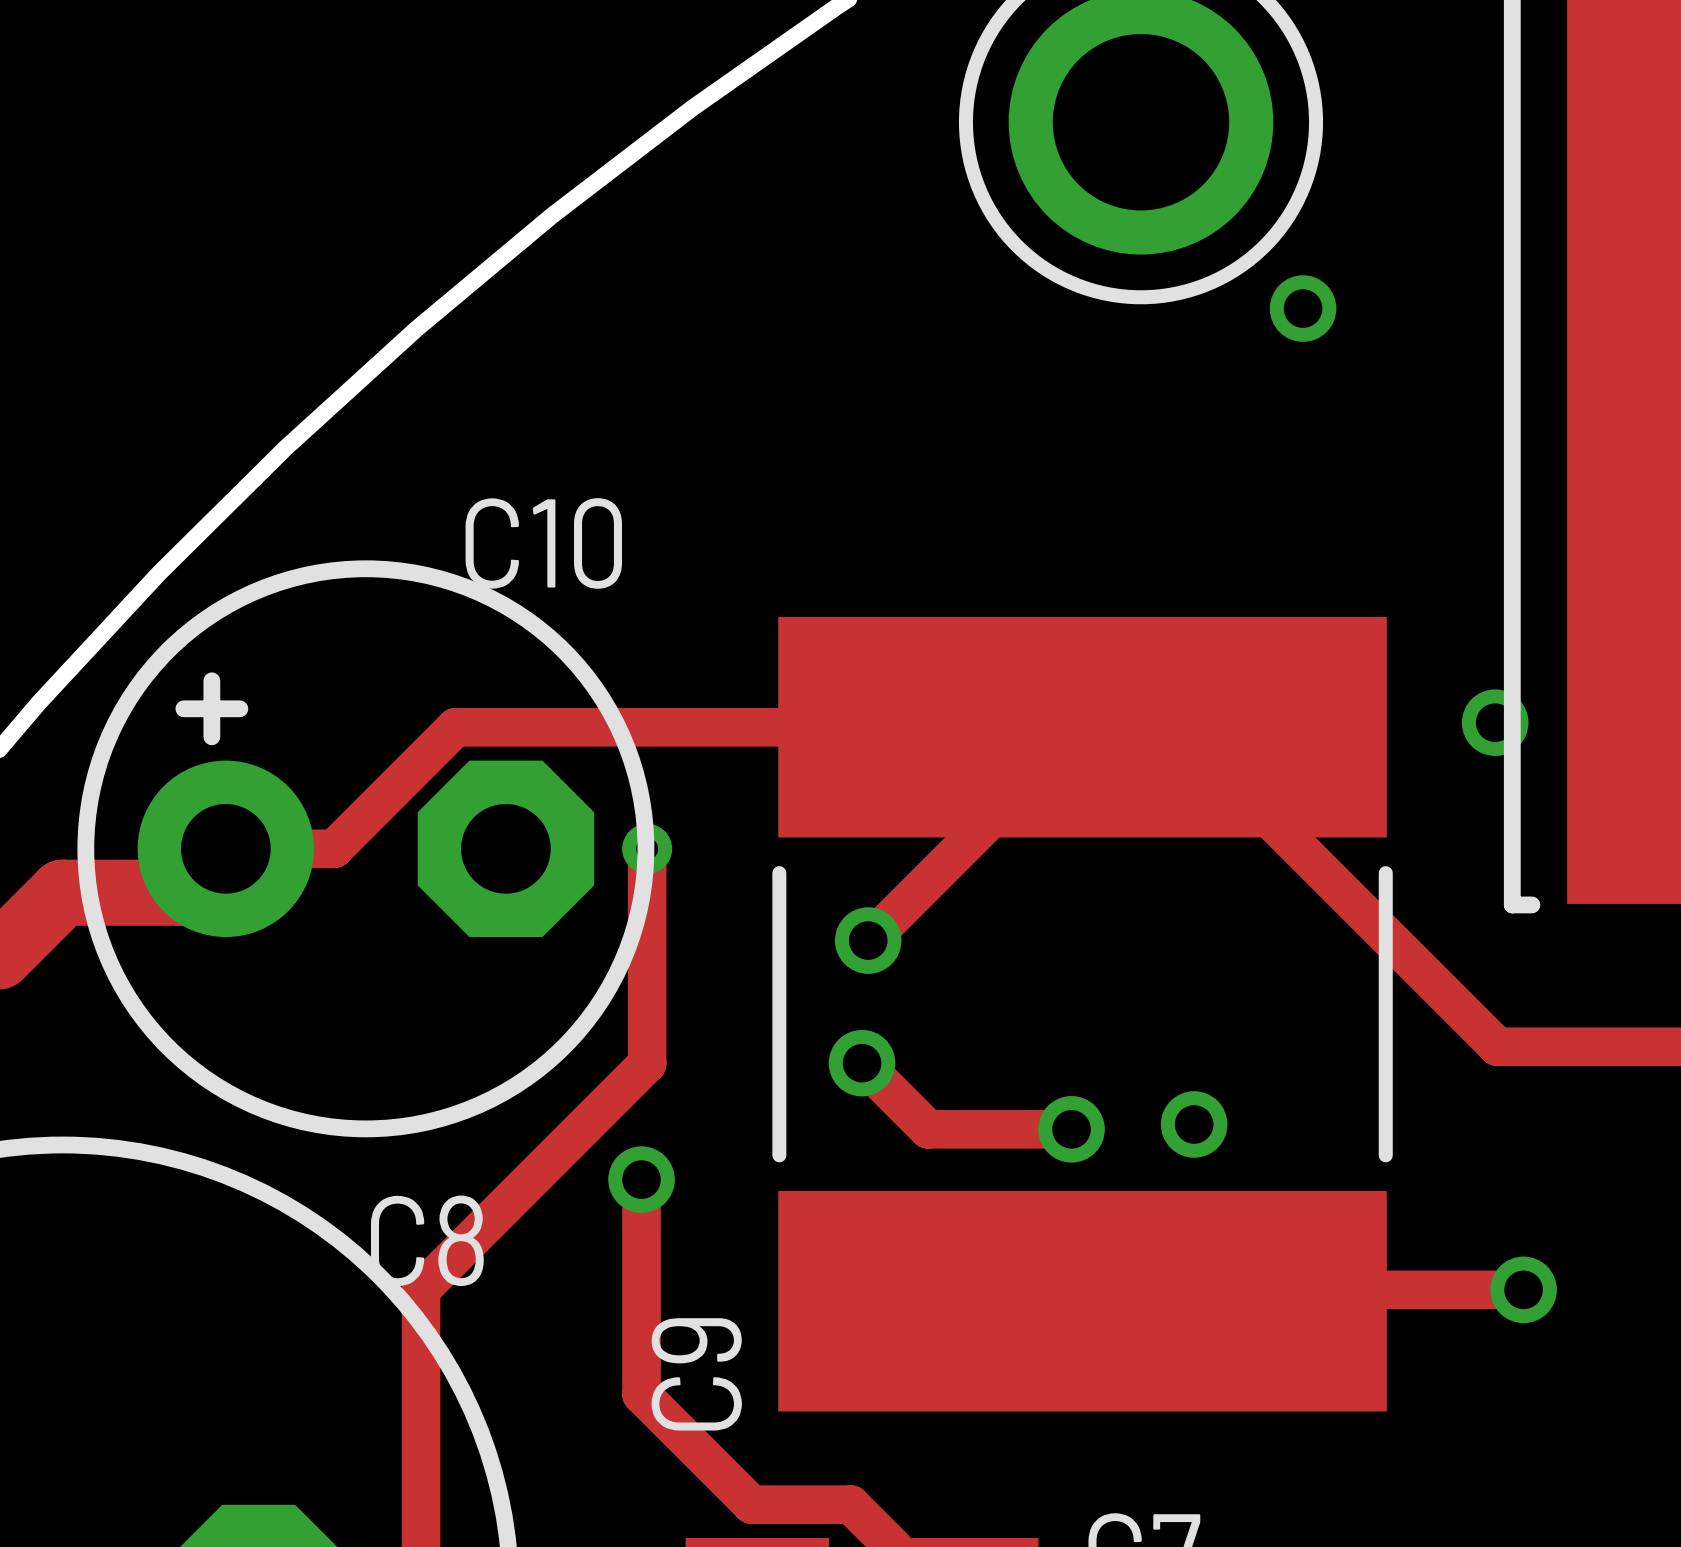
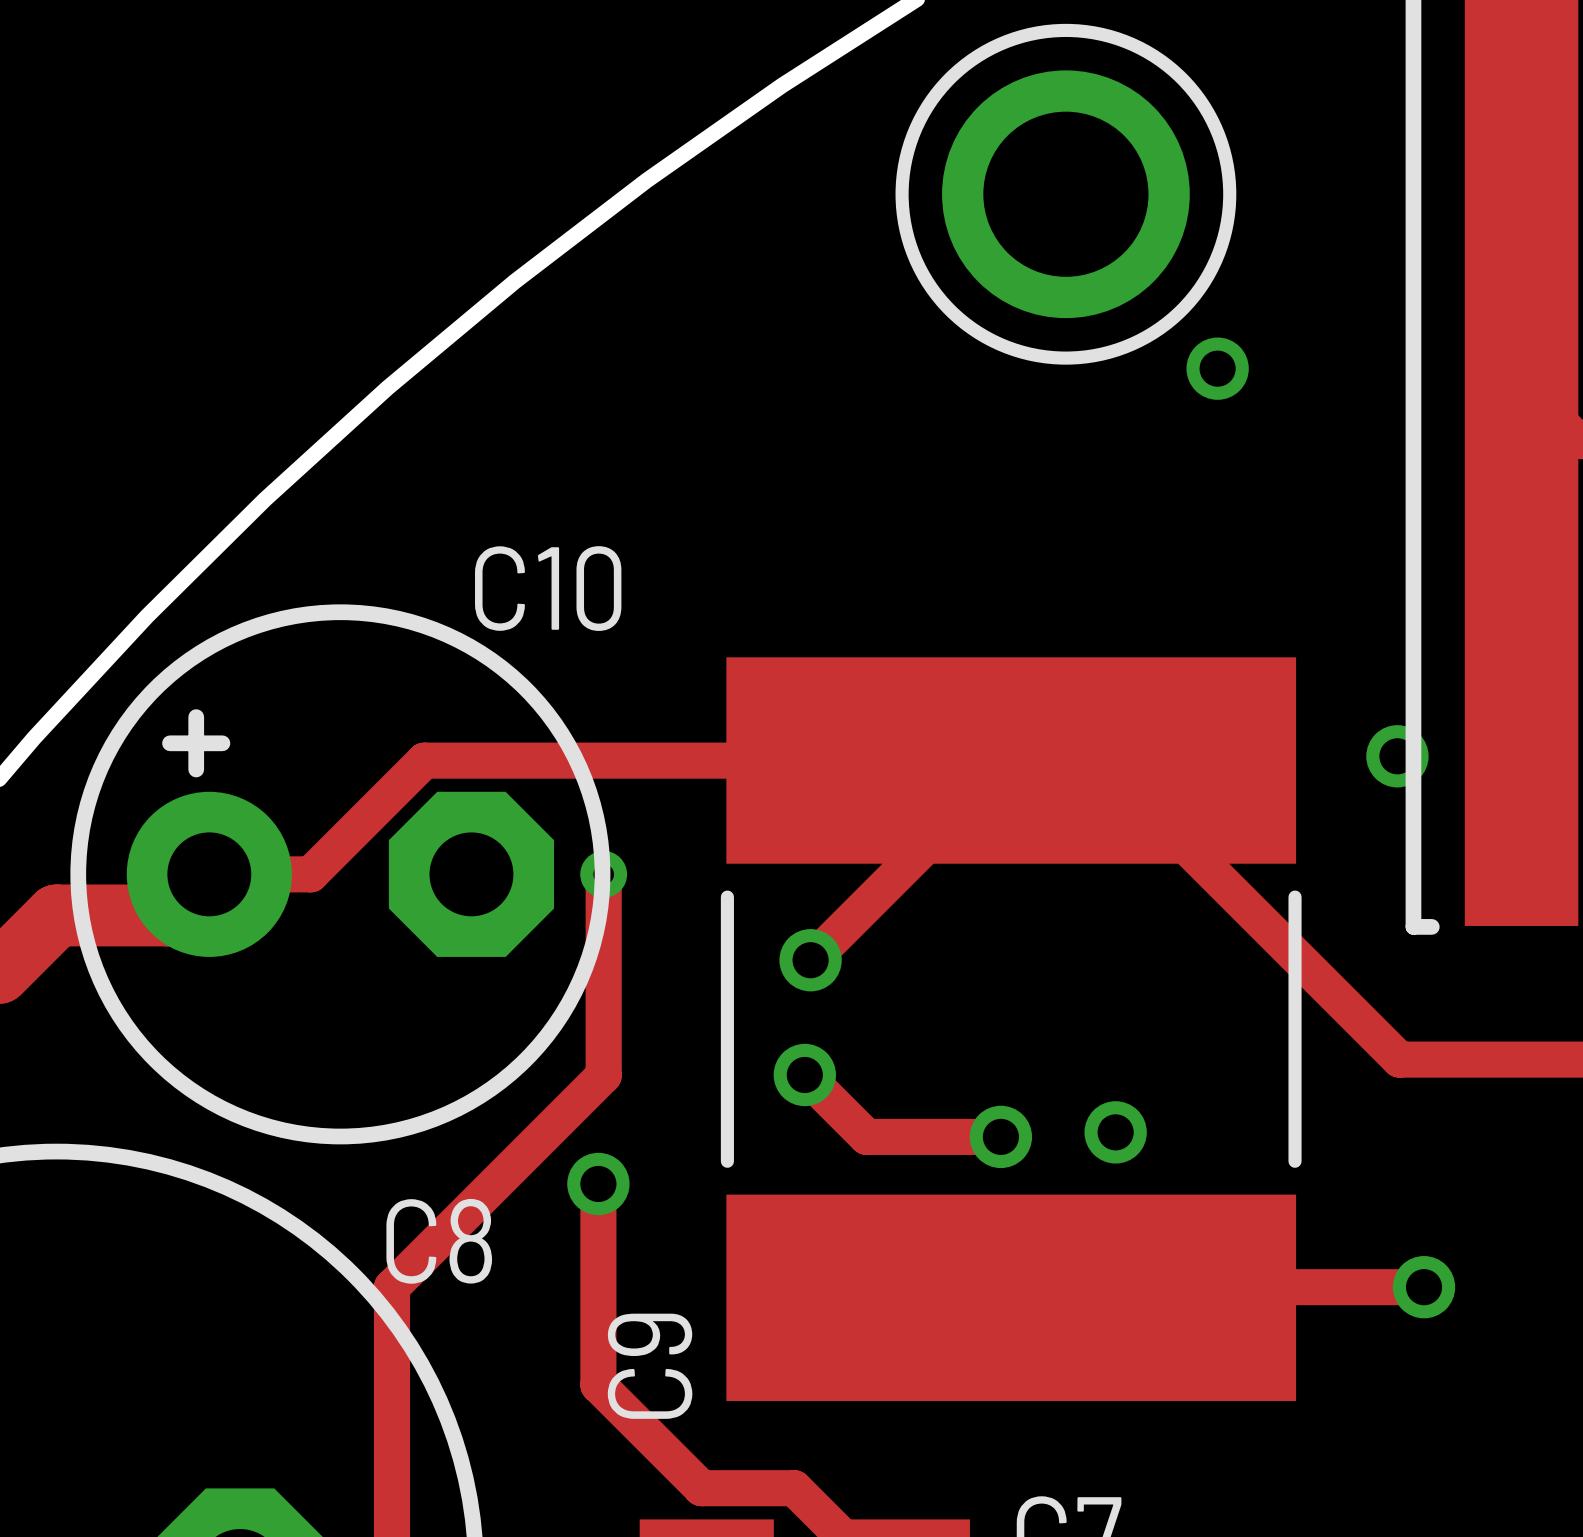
C10 name position: C10 (543, 543) -> C10 (548, 588)
C8 name position: C8 (427, 1240) -> C8 (439, 1241)

